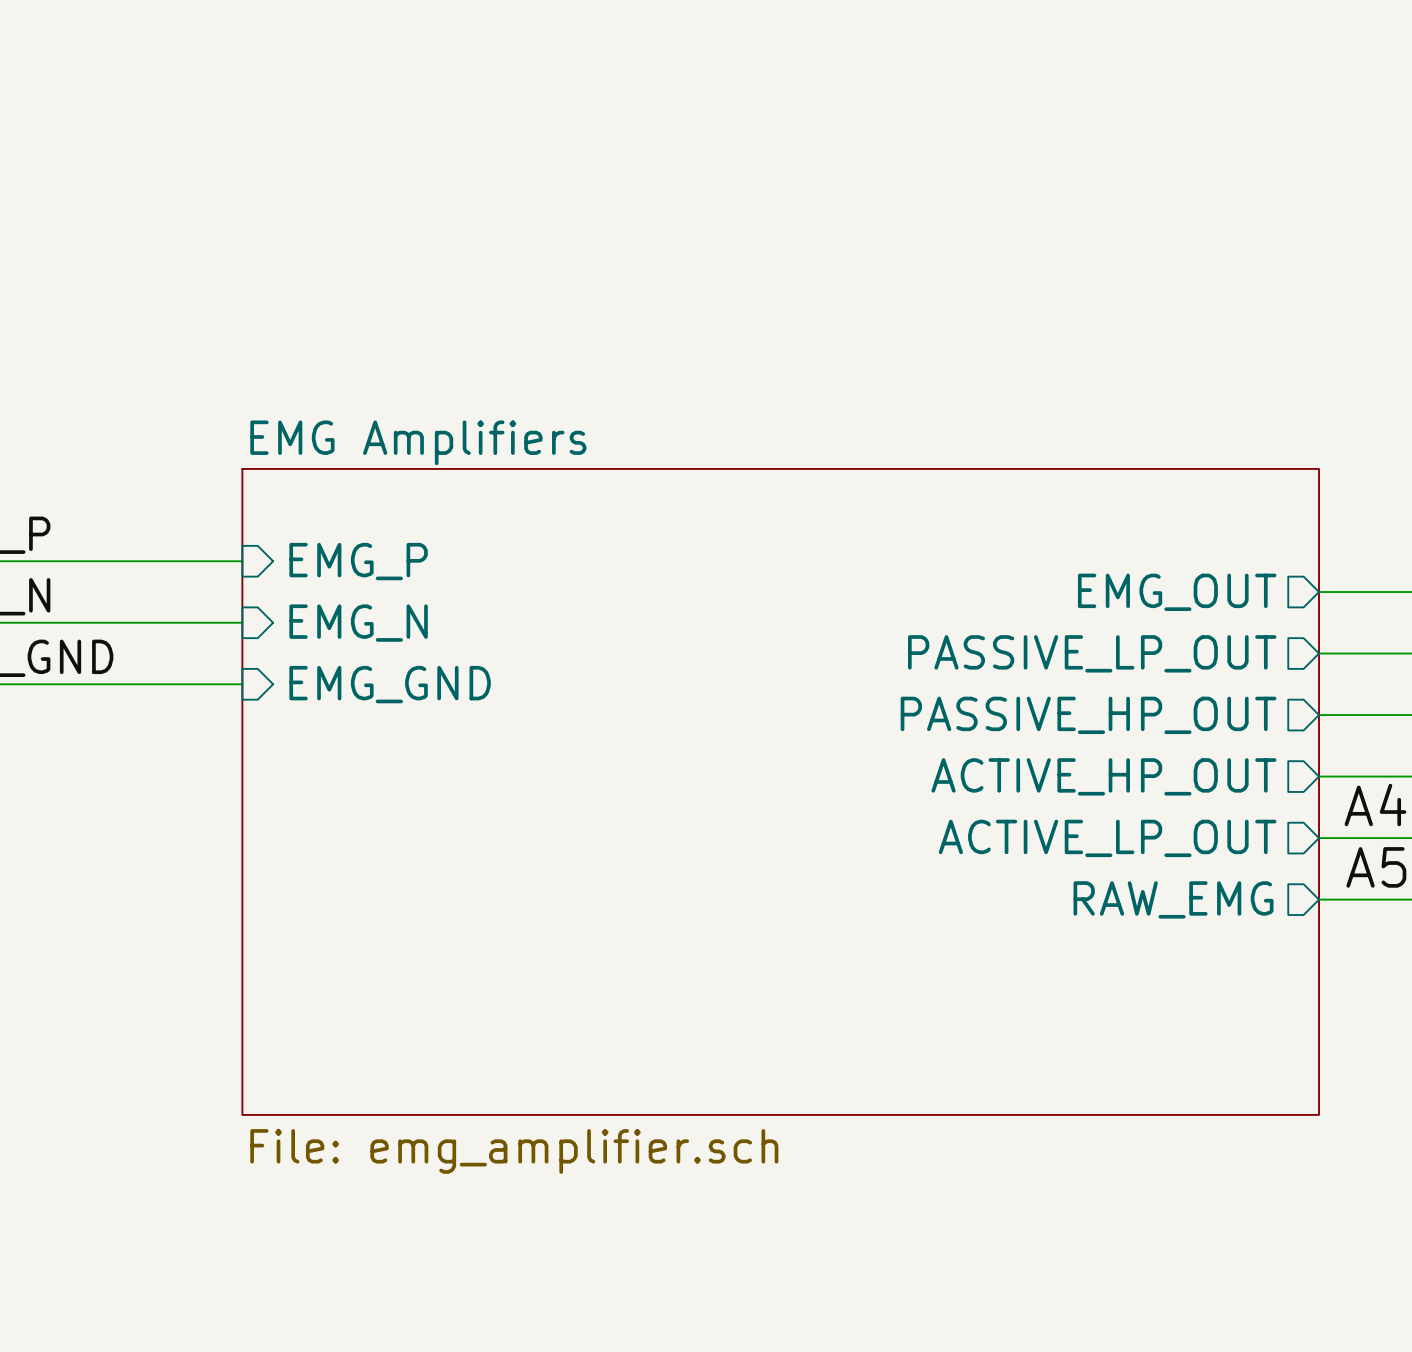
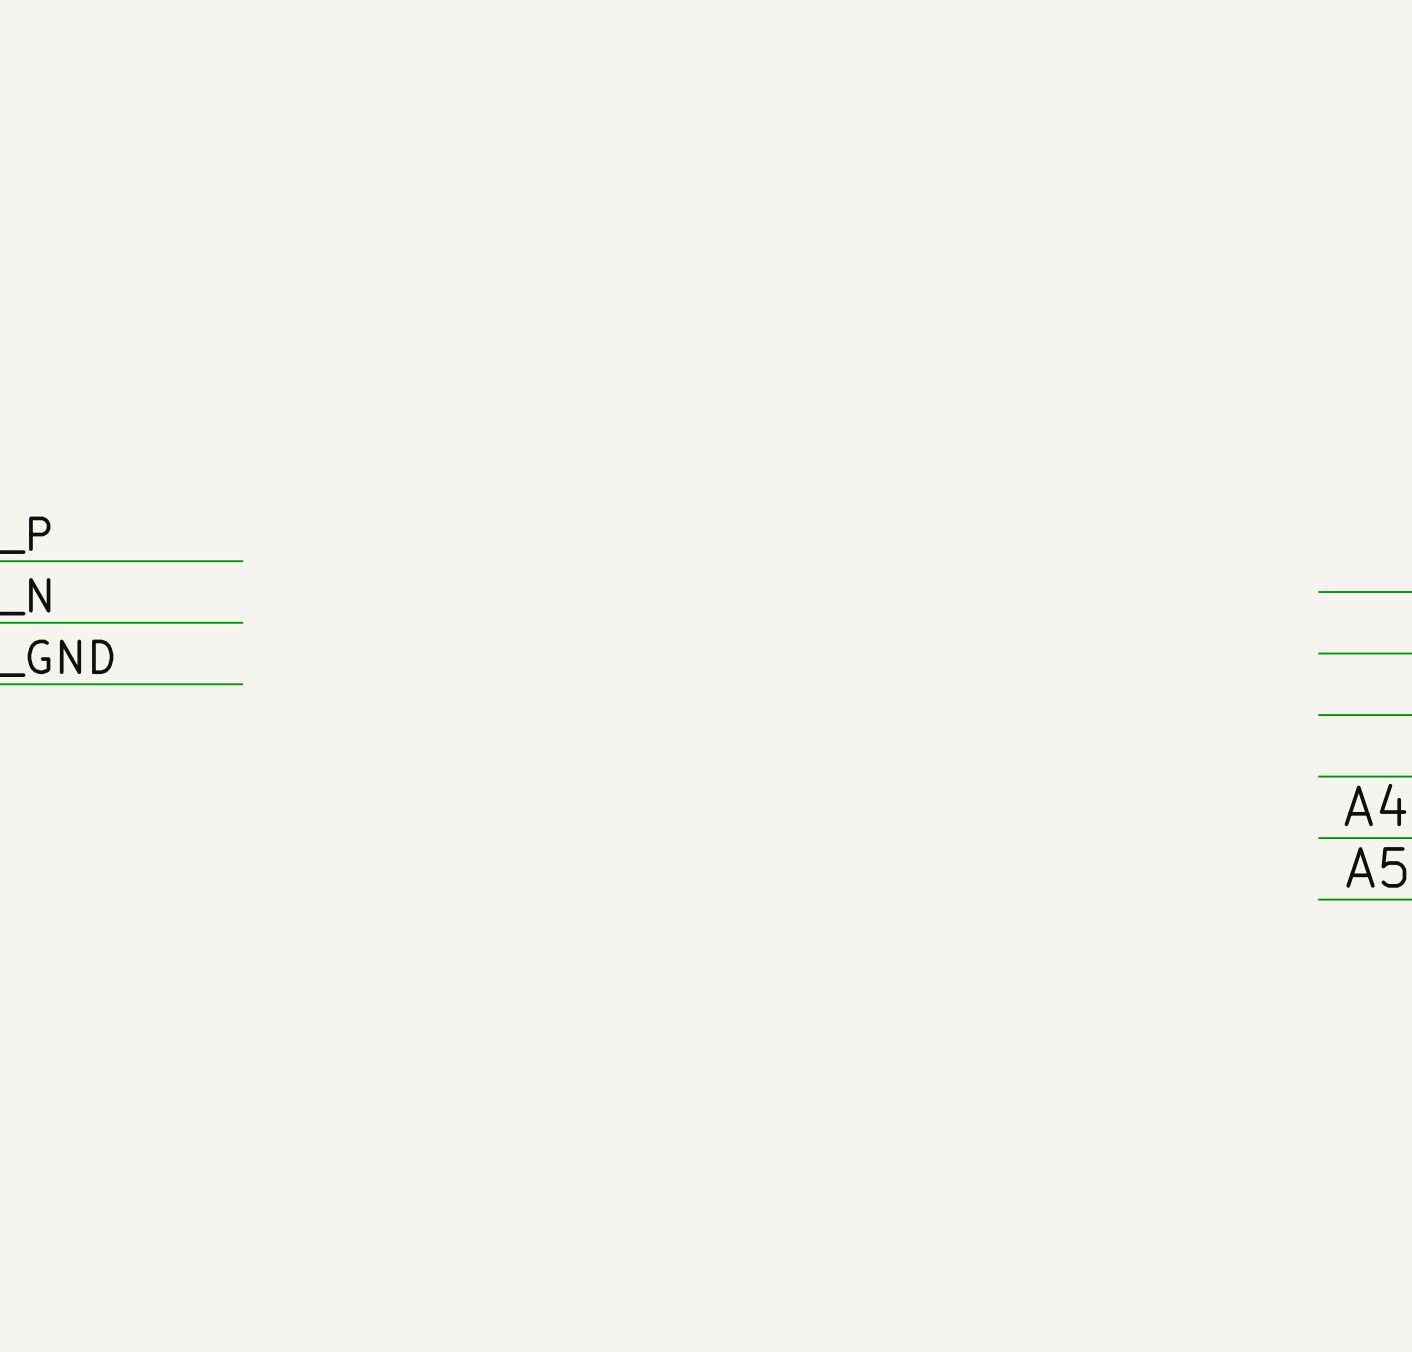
sheet pin: EMG_P (358, 561) -> none
sheet pin: EMG_OUT (1177, 592) -> none
sheet pin: EMG_N (358, 623) -> none
sheet pin: PASSIVE_LP_OUT (1092, 653) -> none
sheet pin: EMG_GND (390, 684) -> none
sheet pin: PASSIVE_HP_OUT (1088, 715) -> none
sheet pin: ACTIVE_HP_OUT (1103, 776) -> none
sheet EMG Amplifiers: File: emg_amplifier.sch (780, 791) -> none
sheet pin: ACTIVE_LP_OUT (1107, 838) -> none
sheet pin: RAW_EMG (1173, 899) -> none

